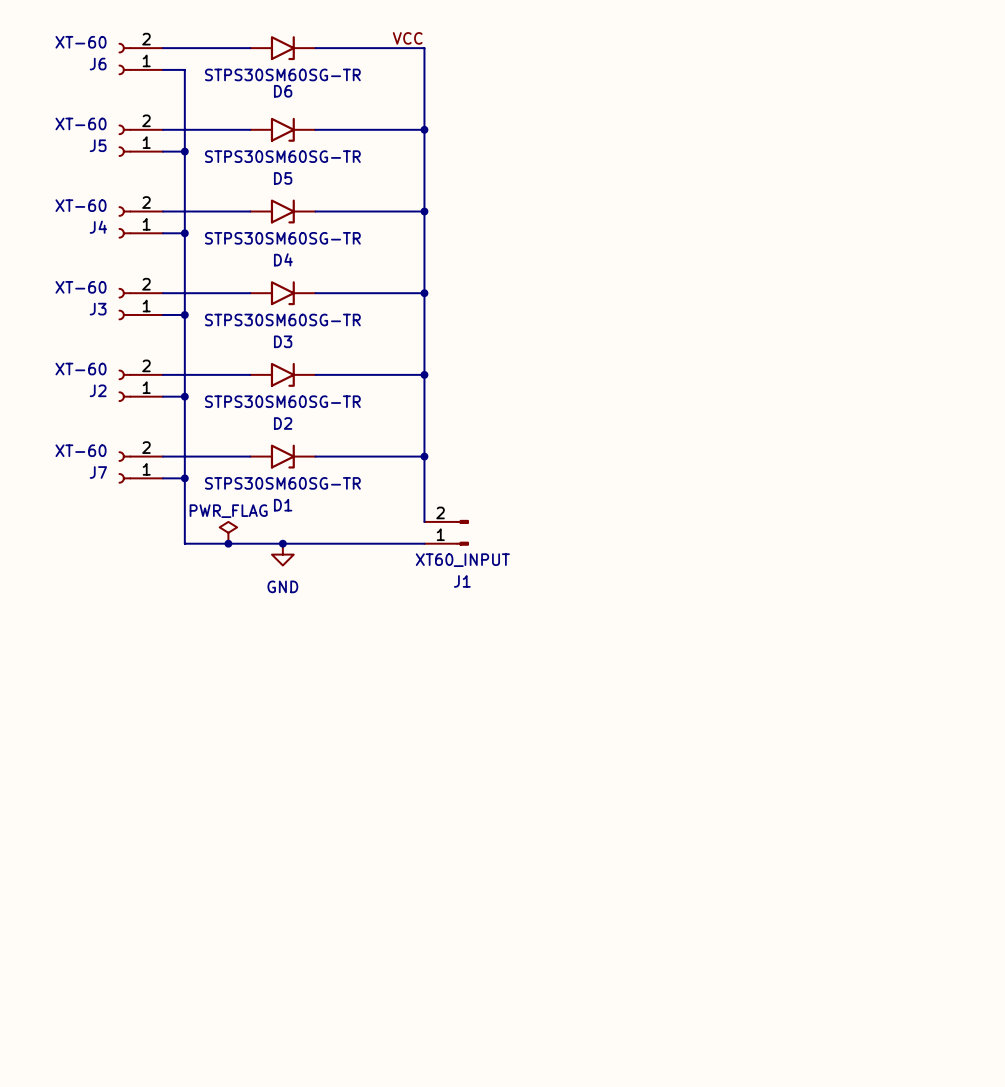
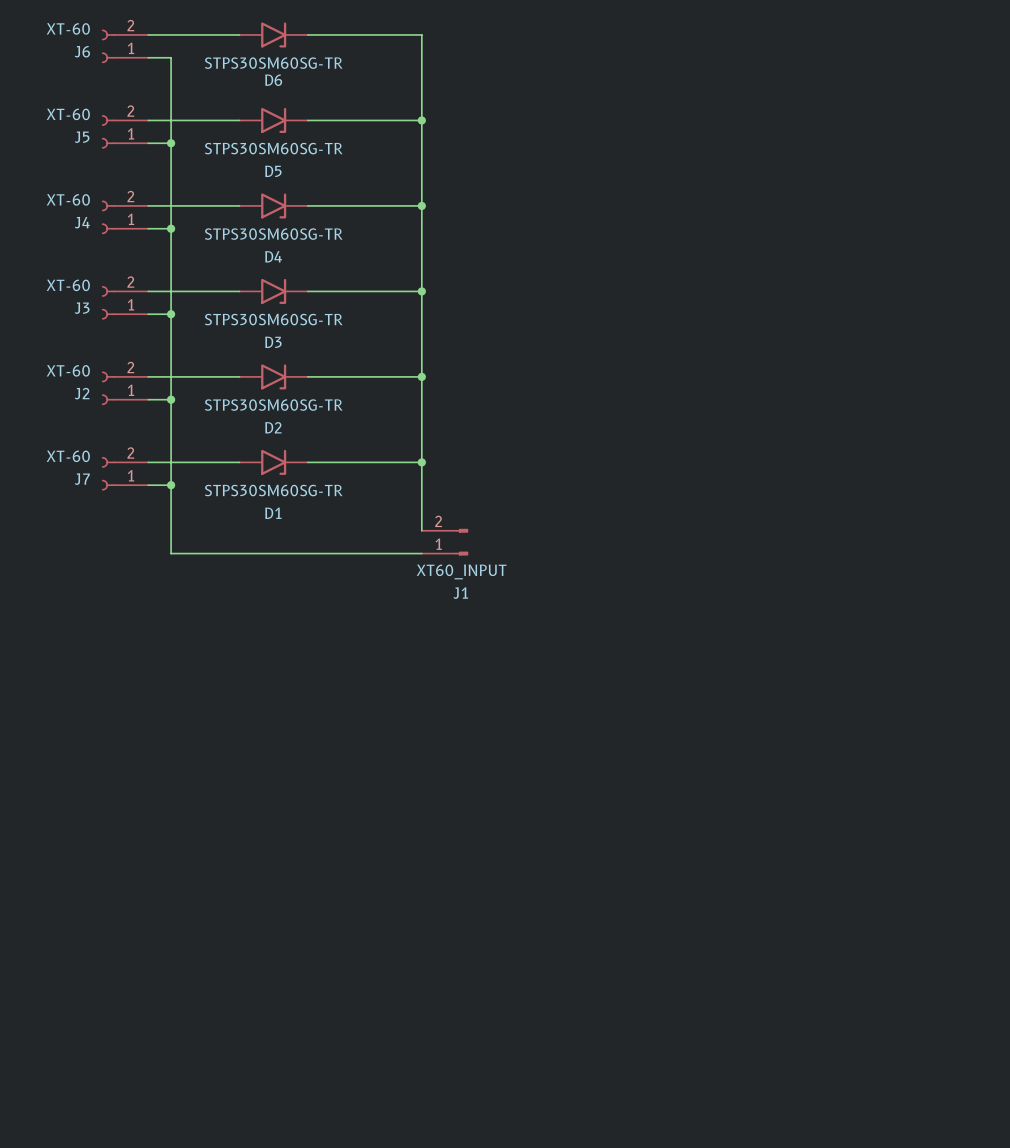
label: VCC (407, 38) -> none
power symbol: PWR_FLAG (228, 532) -> none
junction: (228, 543) -> none
junction: (282, 543) -> none
power symbol: GND (282, 554) -> none

